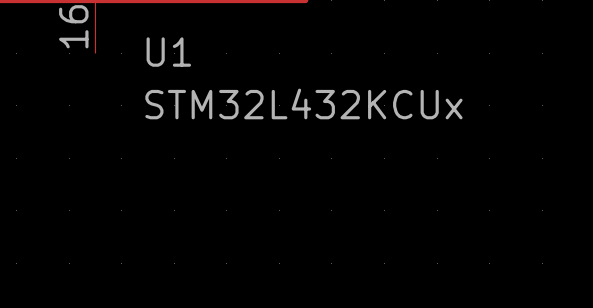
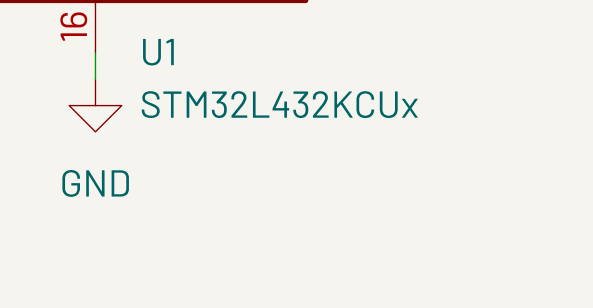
wire: none -> (95, 53) (95, 79)
power symbol: none -> GND (95, 105)

